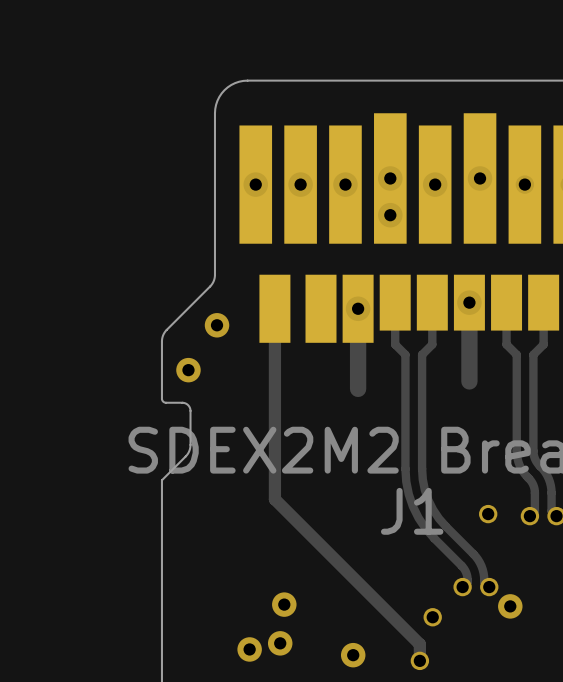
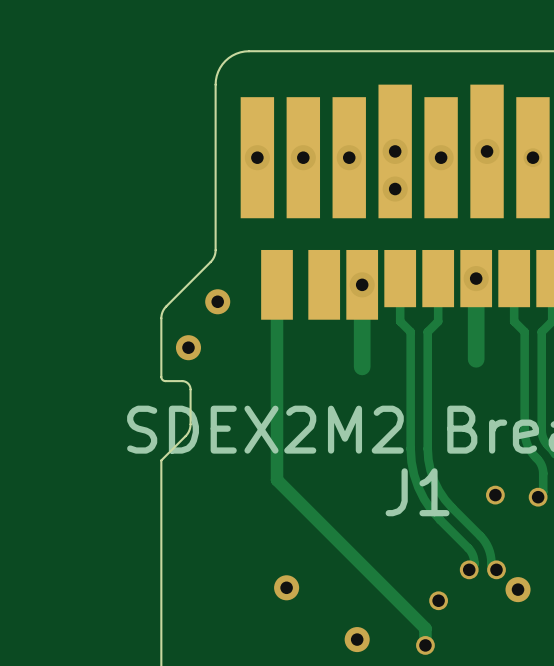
via: (280, 643) -> none
via: (249, 649) -> none

